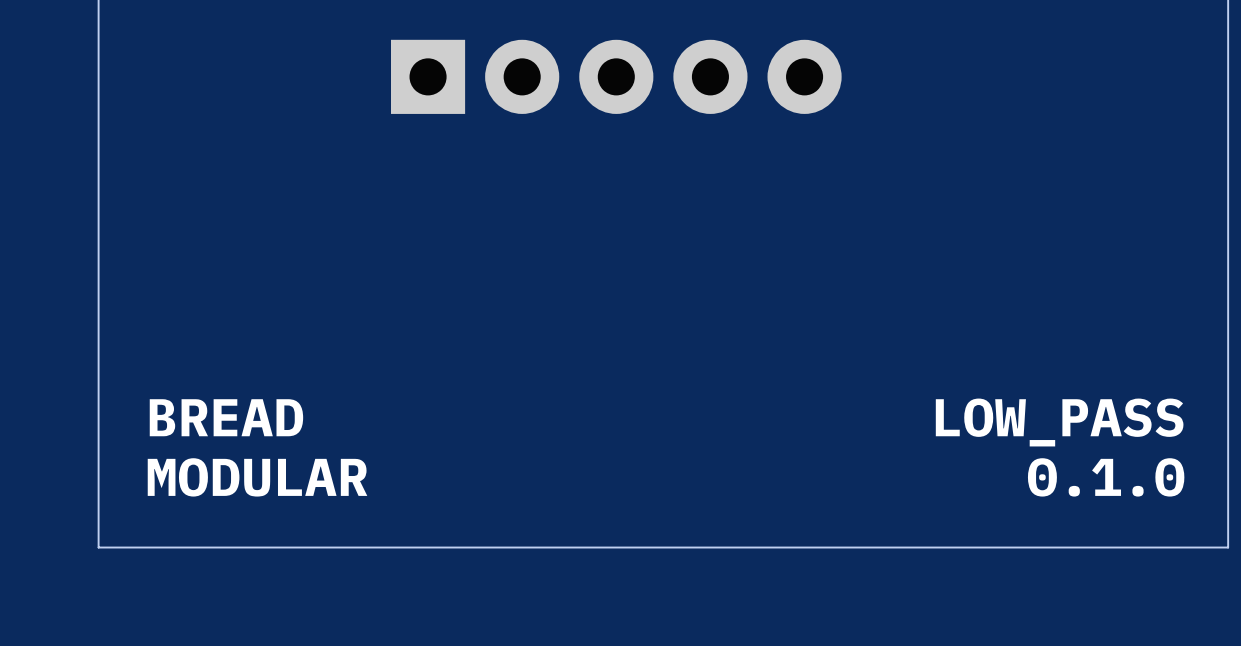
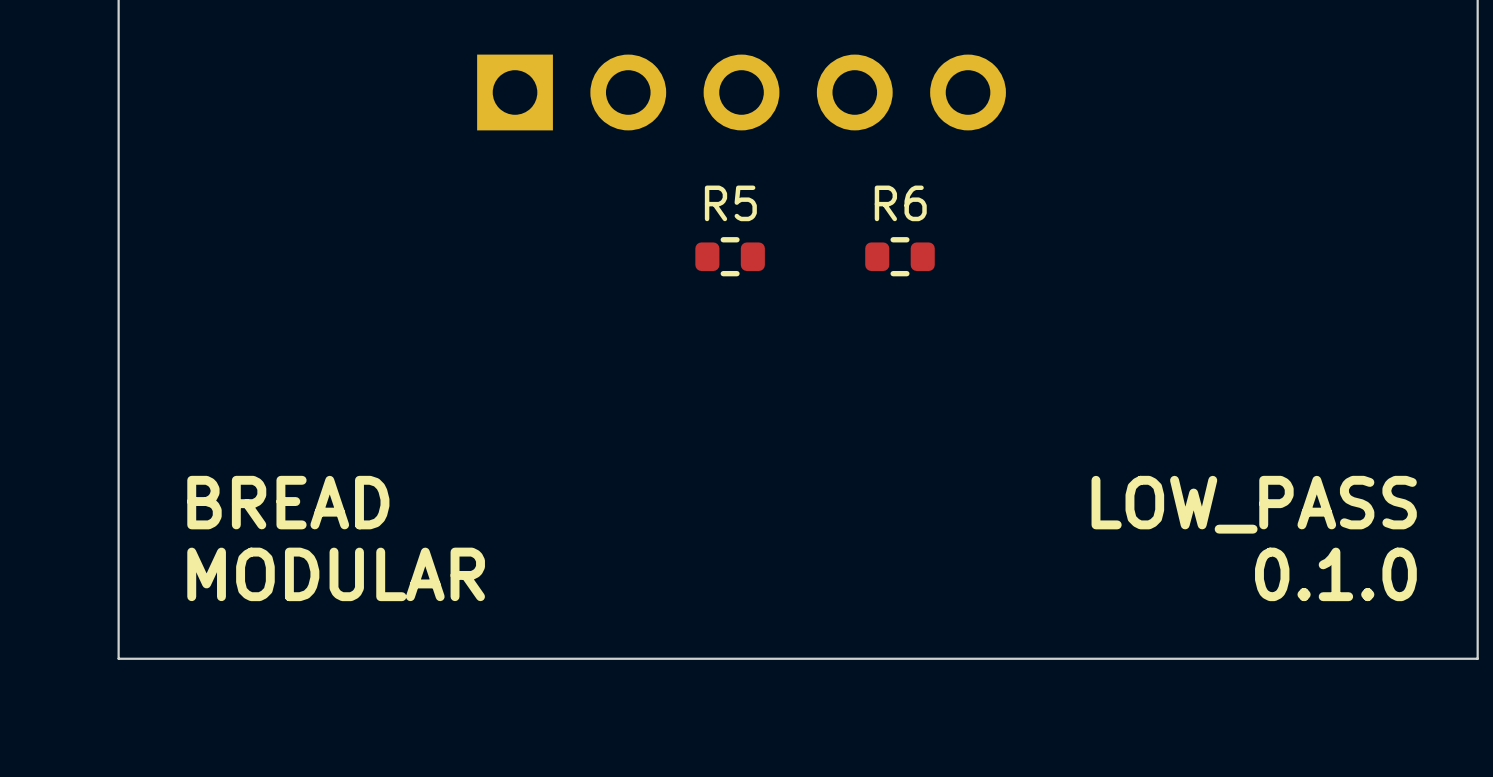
part footprint: [390, 39, 842, 114] -> [477, 54, 1006, 131]
R5: none -> (730, 256)
R6: none -> (899, 256)

